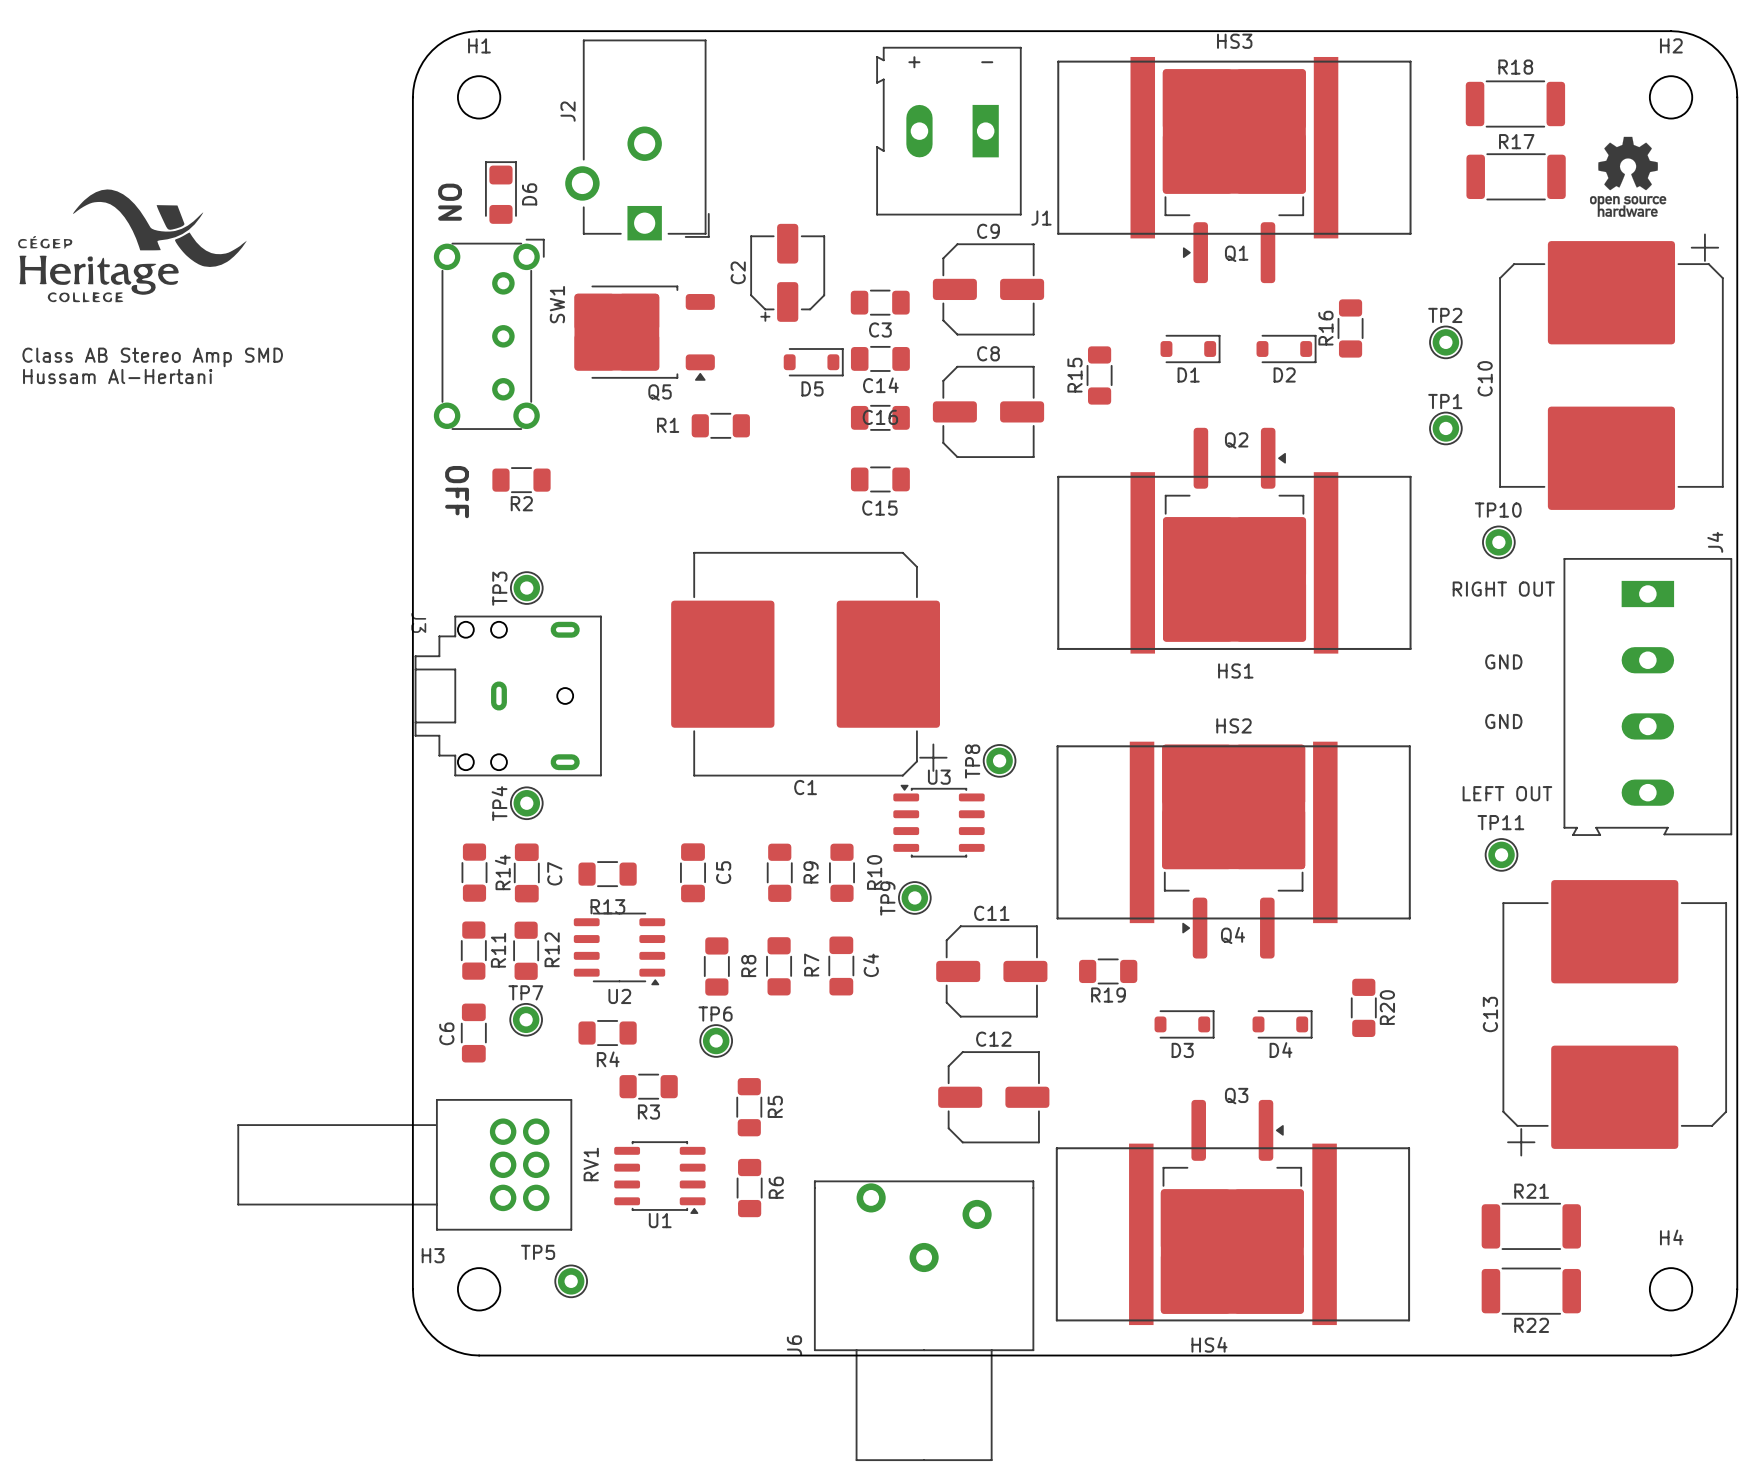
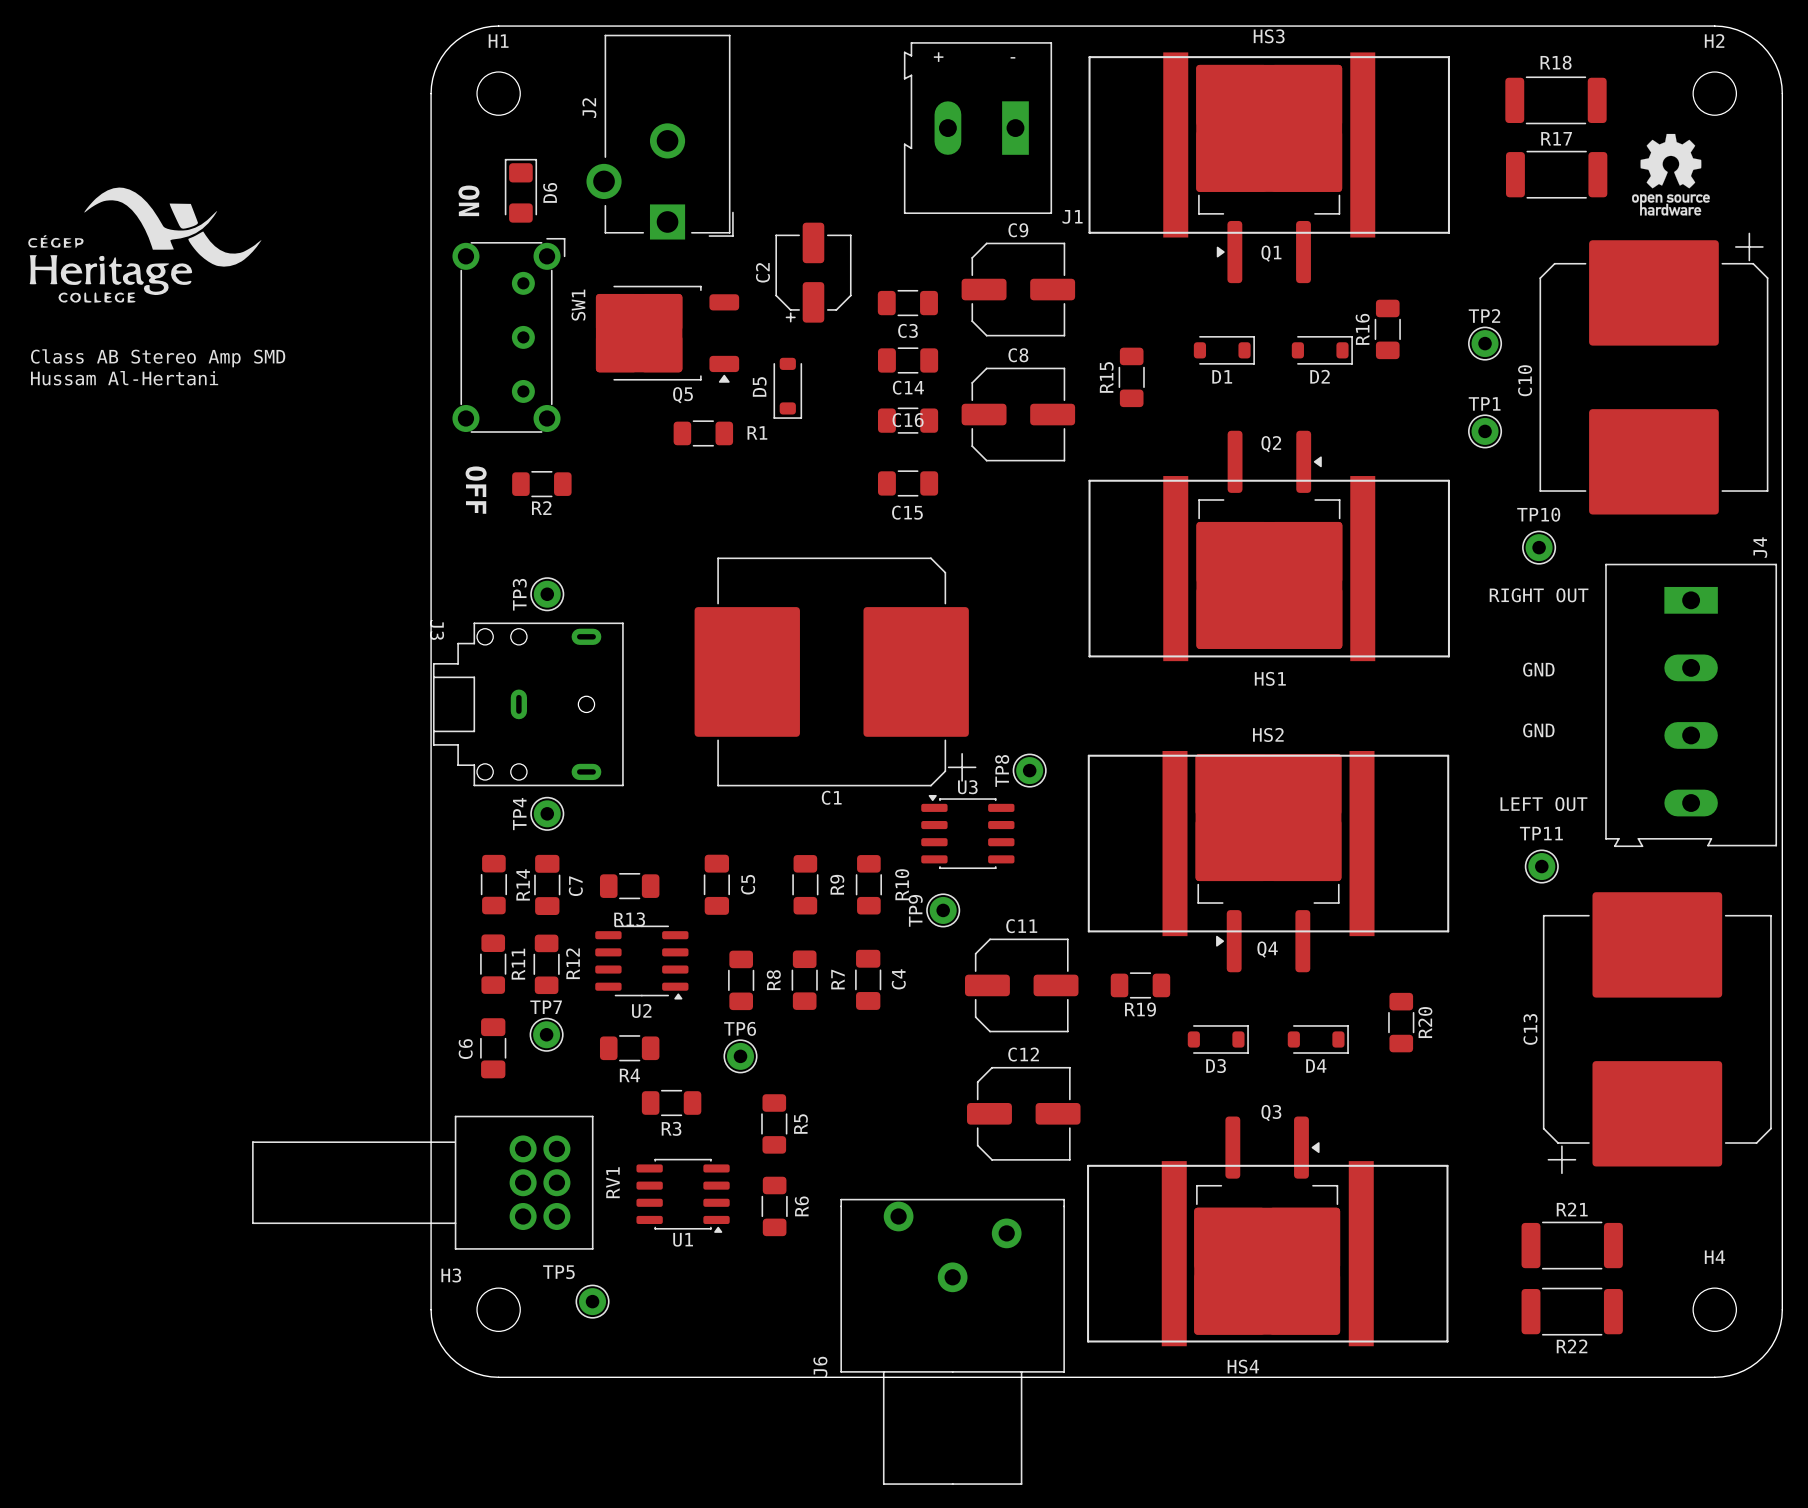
D5 rotation: 0° (813, 362) -> 90° clockwise (787, 388)
D5 position: (813, 362) -> (787, 388)
R1 name position: R1 (668, 425) -> R1 (757, 432)
R1 position: (720, 425) -> (703, 433)

